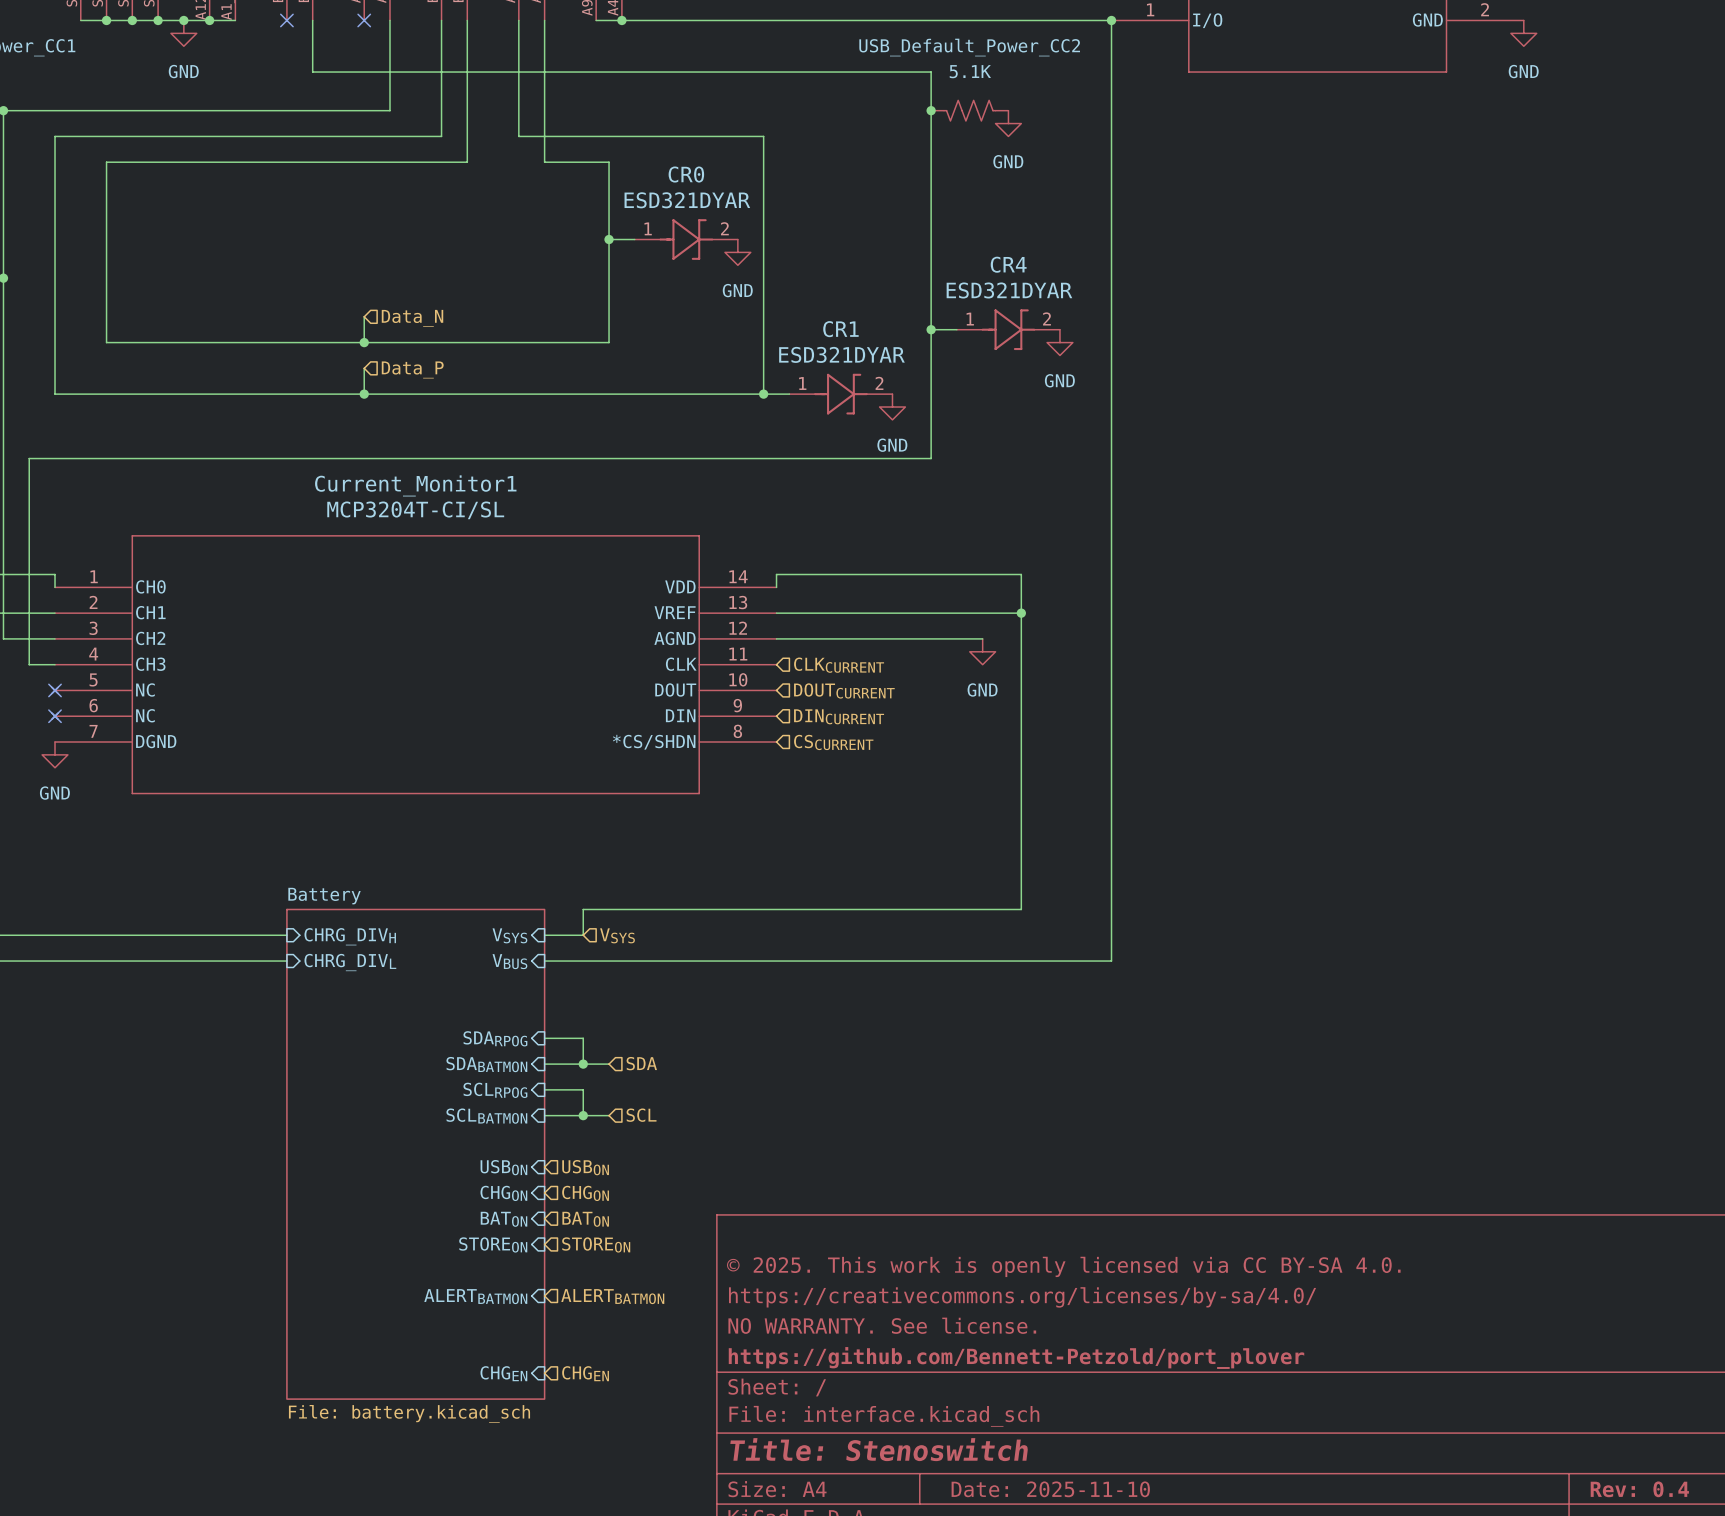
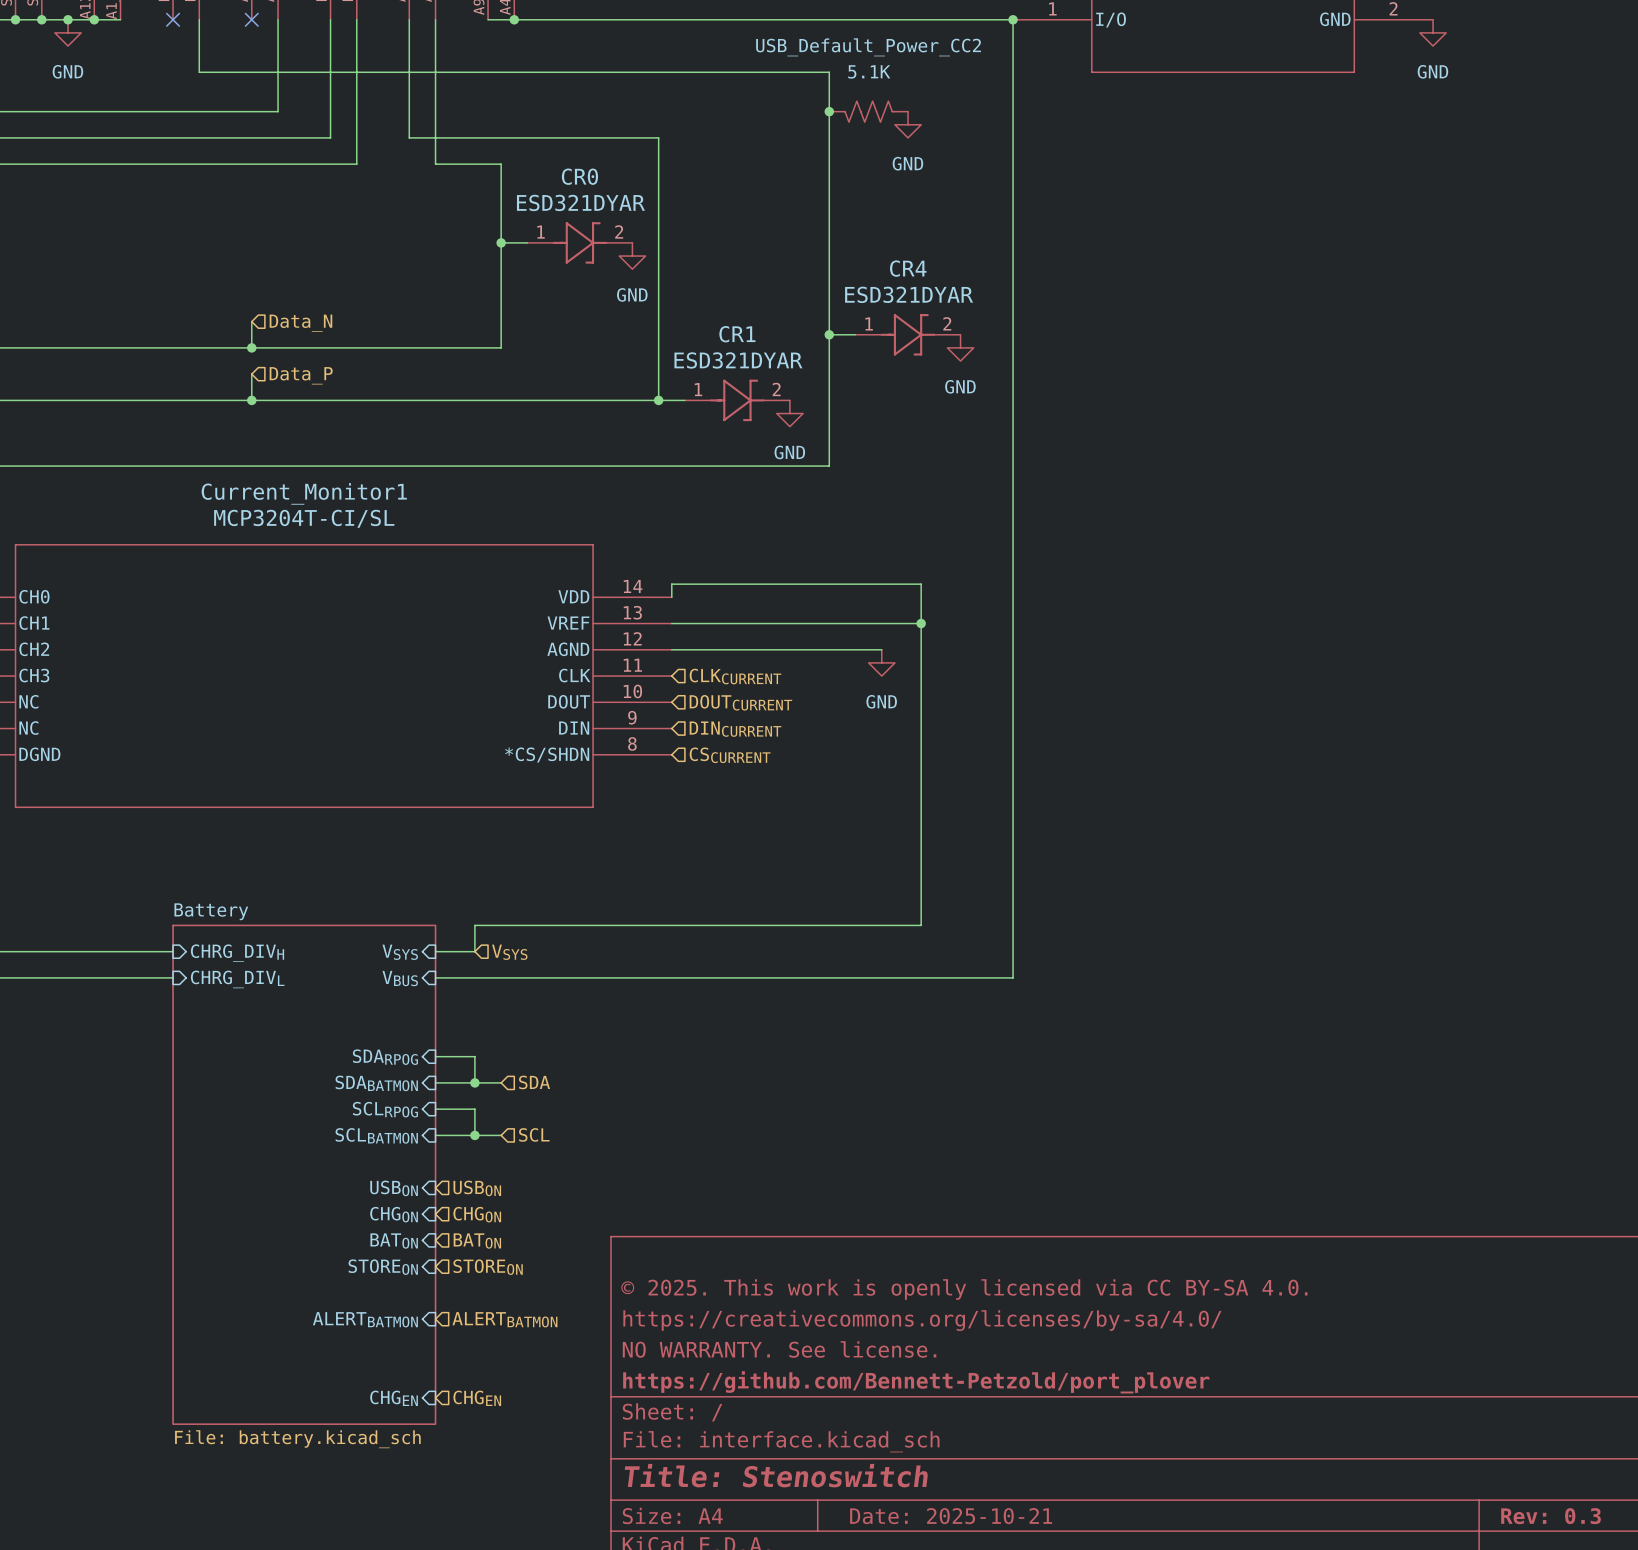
title block: Date: 2025-11-10 (1050, 1489) -> Date: 2025-10-21 (951, 1516)
title block: Rev: 0.4 (1639, 1489) -> Rev: 0.3 (1551, 1516)

